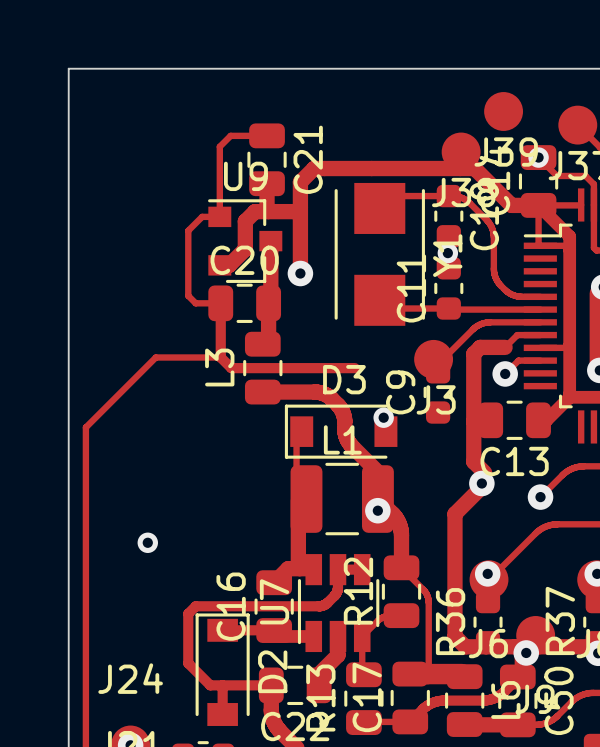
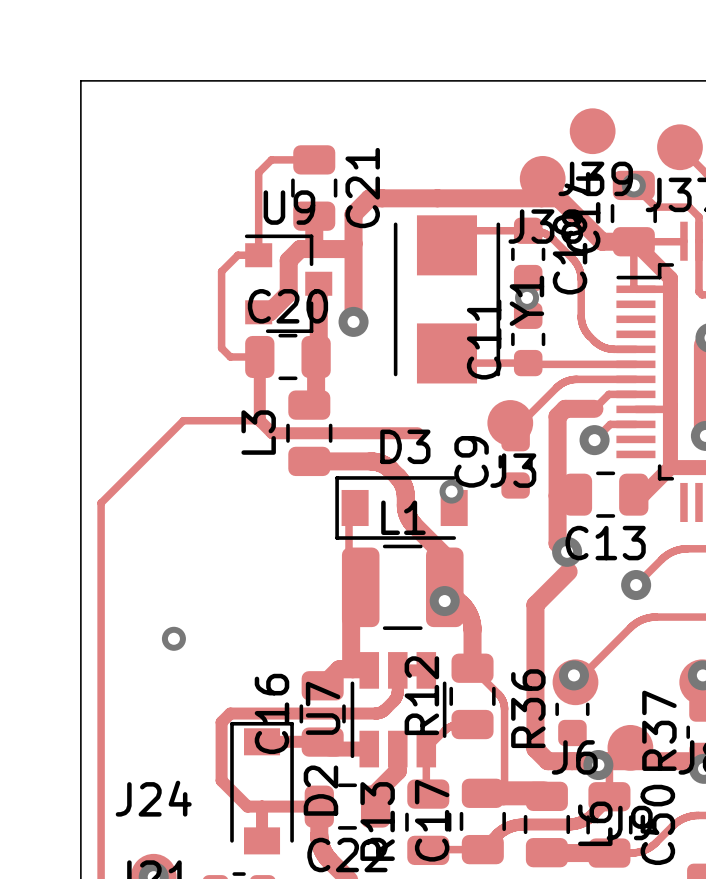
via position: (481, 483) -> (567, 551)
R36 position: (488, 622) -> (572, 709)
via position: (526, 652) -> (598, 765)

